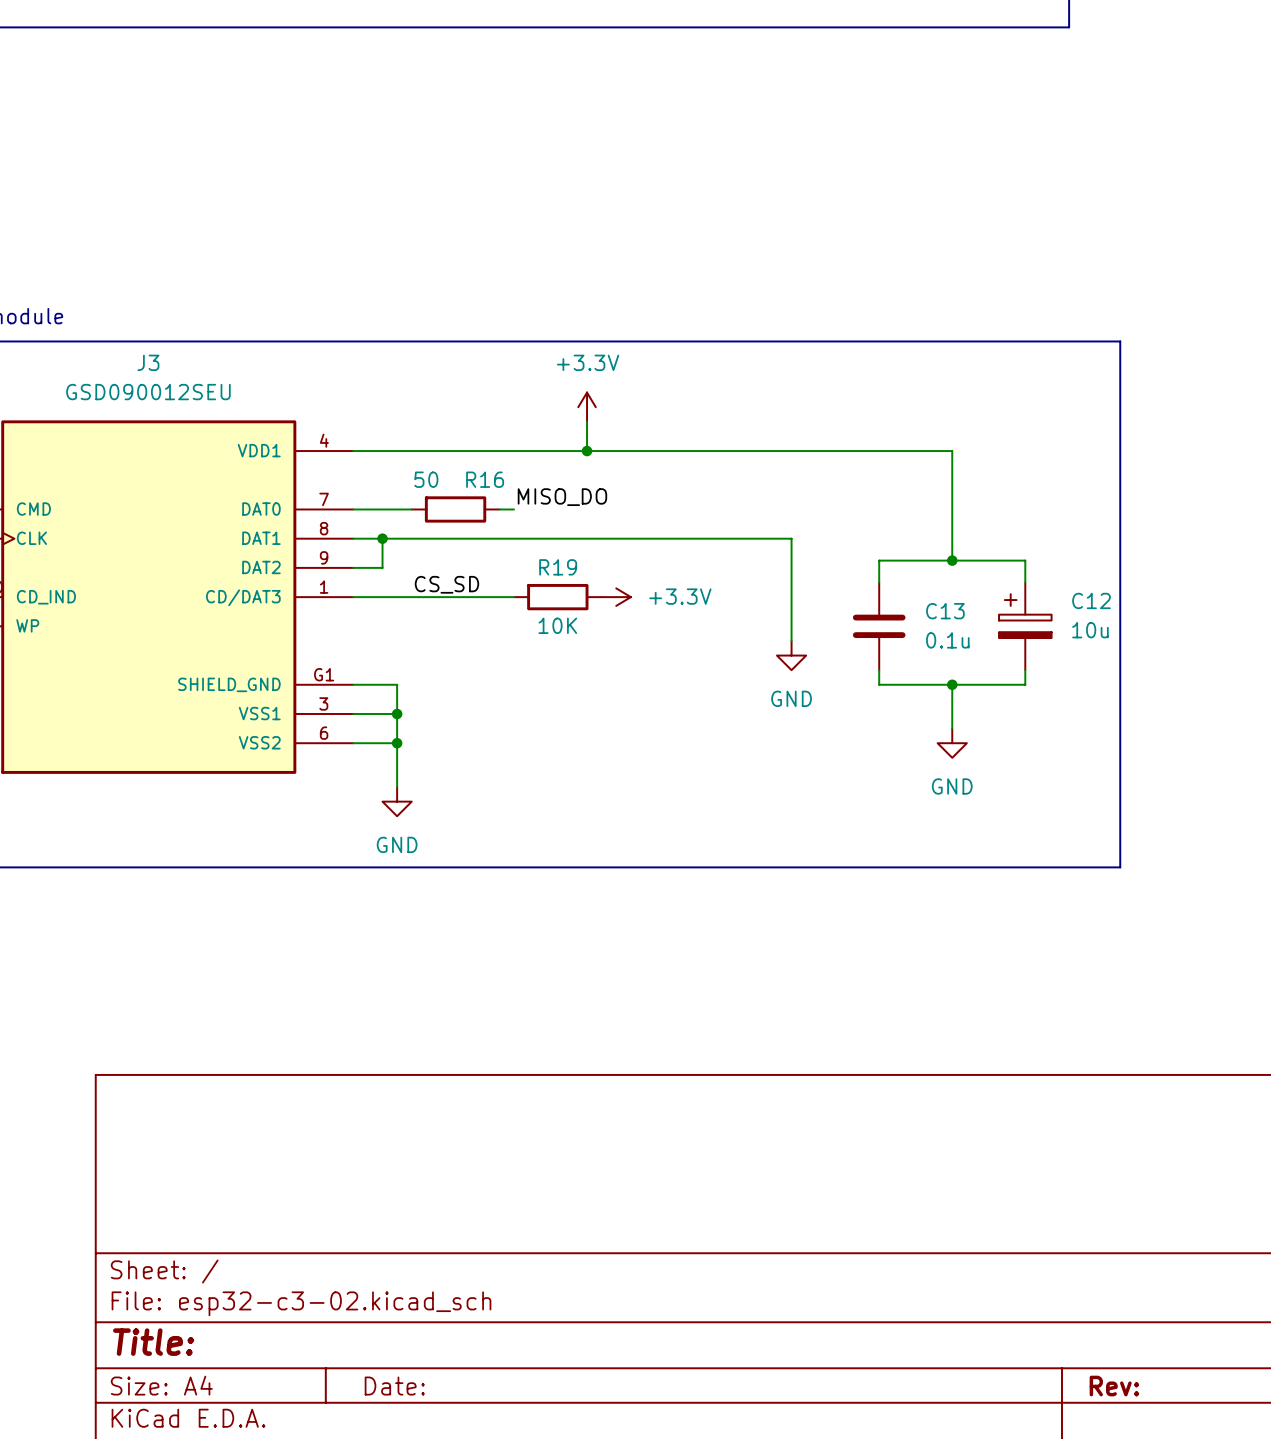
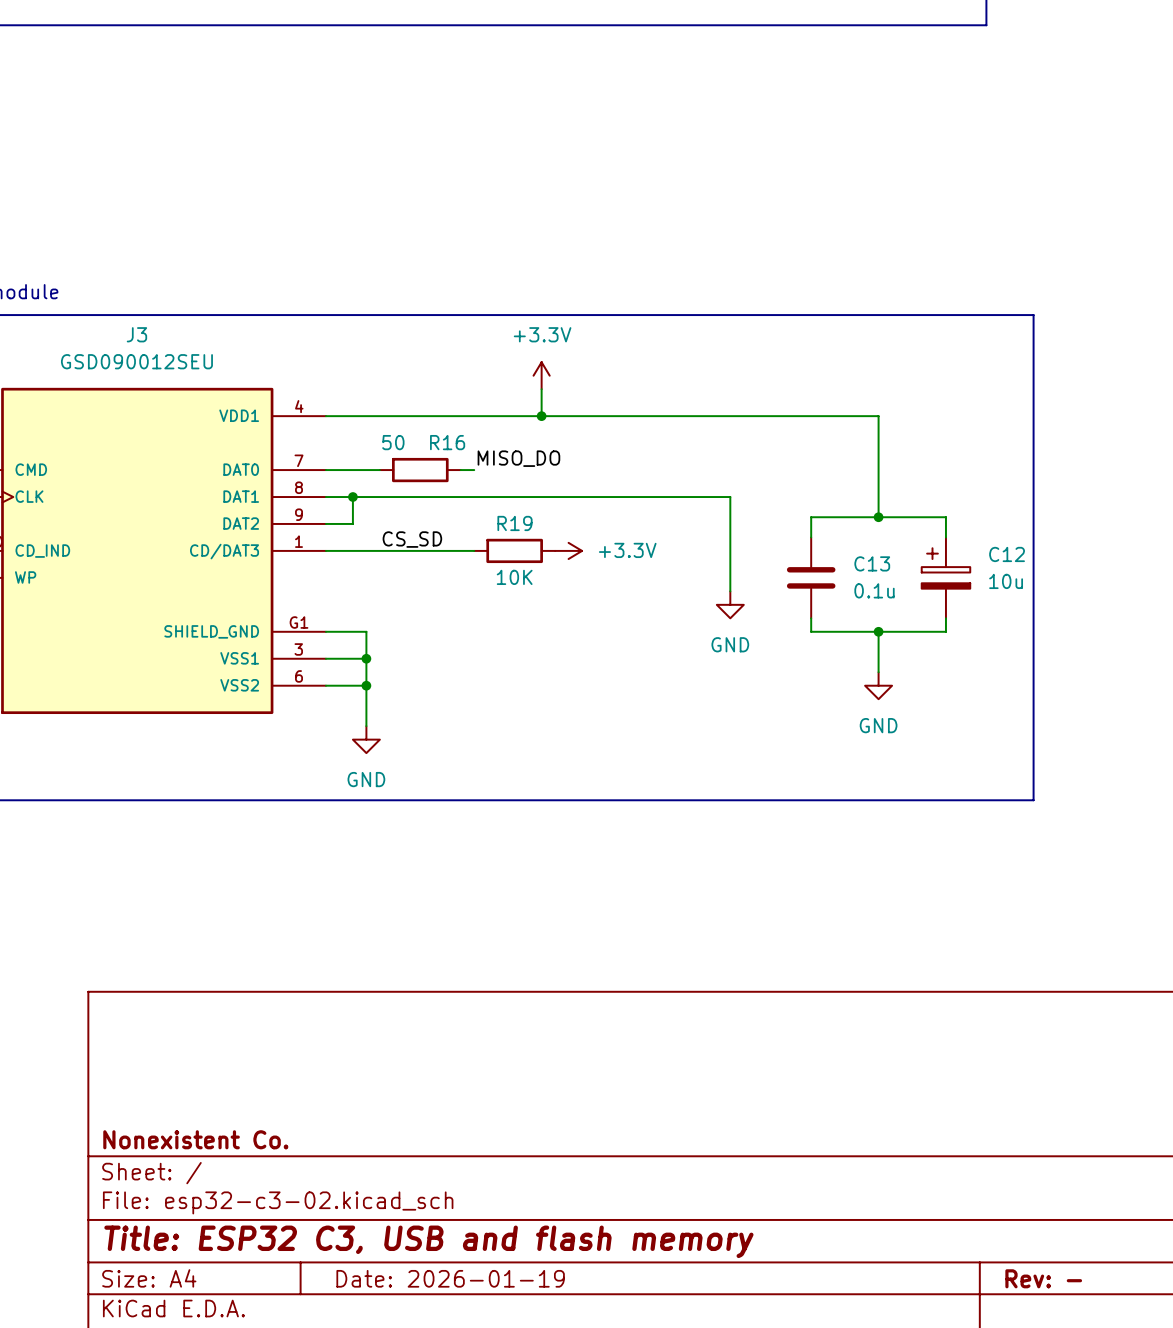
title block: none -> Nonexistent Co. (195, 1139)
title block: Title: (153, 1342) -> Title: ESP32 C3, USB and flash memory (428, 1241)
title block: Date: (394, 1386) -> Date: 2026-01-19 (450, 1278)
title block: Rev: (1114, 1386) -> Rev: - (1043, 1278)

